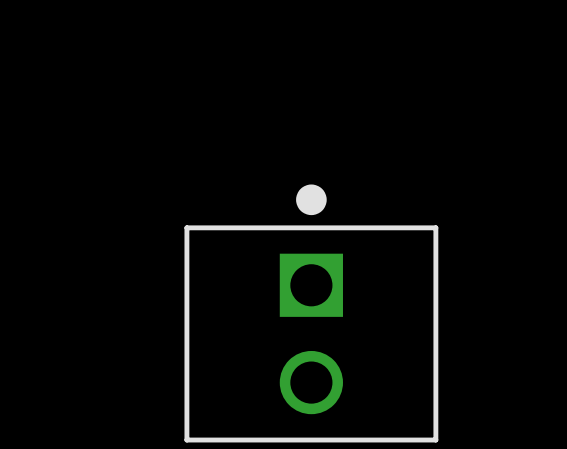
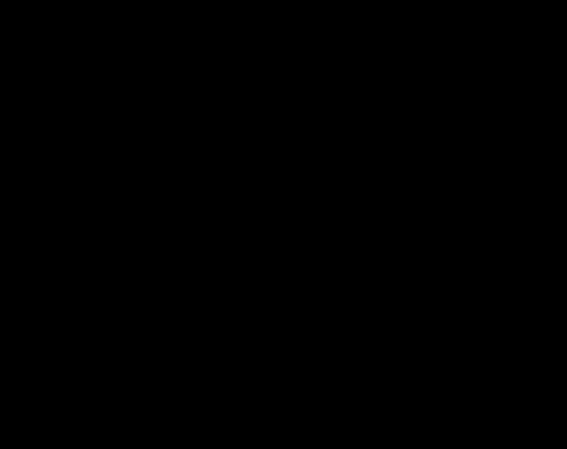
part: (311, 313) -> none

